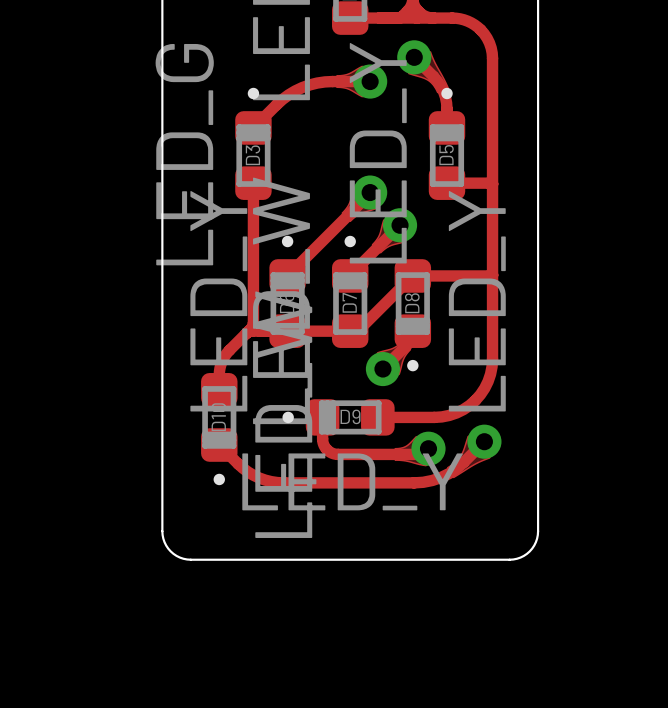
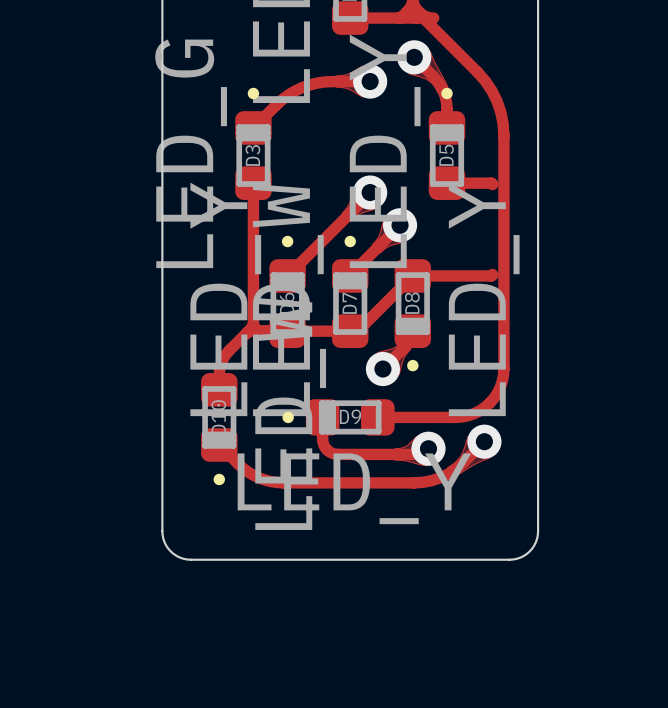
track: (418, 18) (456, 18) (471, 22) (480, 29) (487, 38) (492, 58) (492, 366) (484, 388) (475, 400) (456, 412) (434, 417) -> (418, 12) (485, 81) (497, 101) (503, 123) (503, 135) (503, 368) (502, 381) (493, 398) (479, 410) (461, 417) (434, 417)

